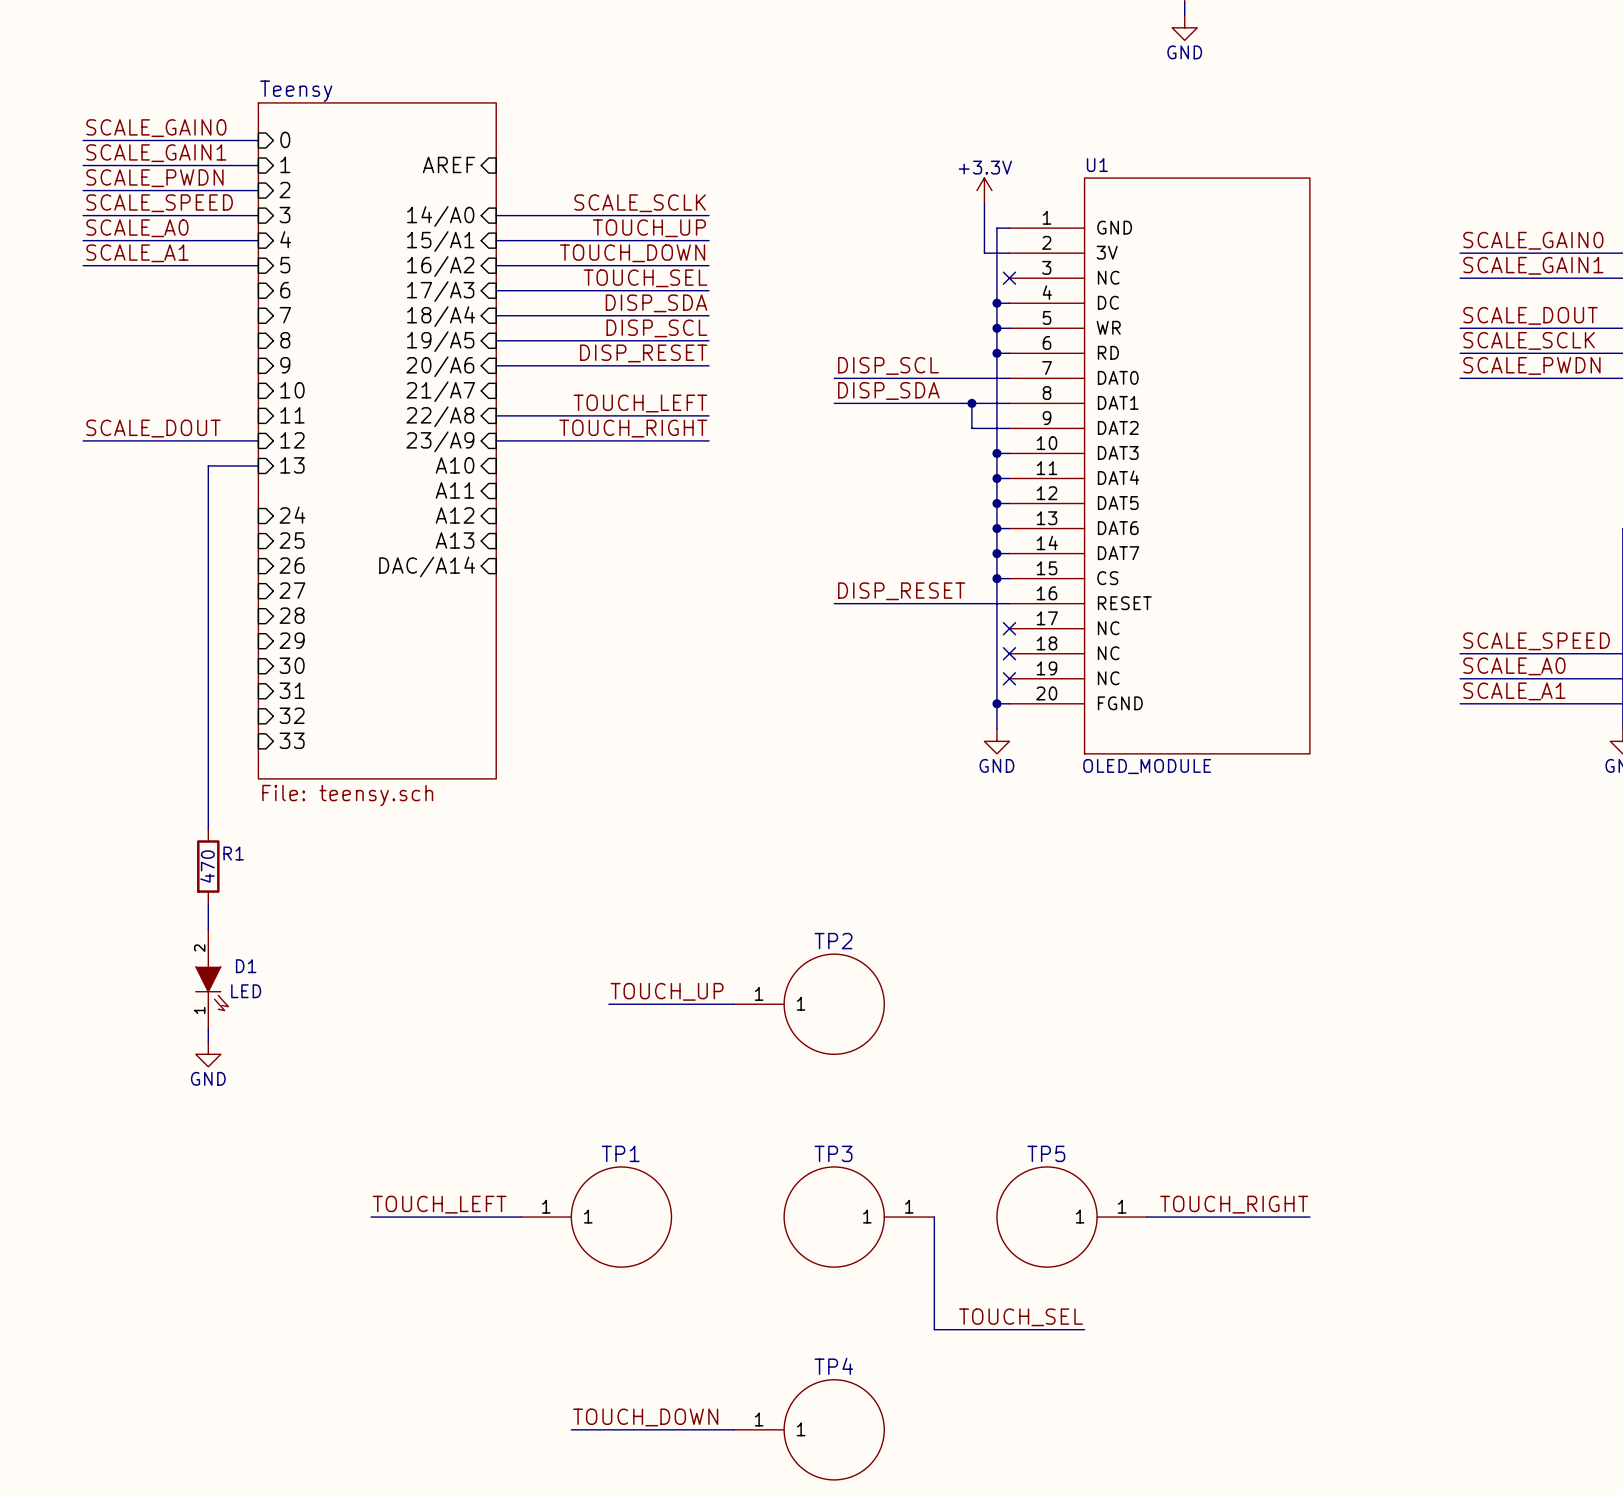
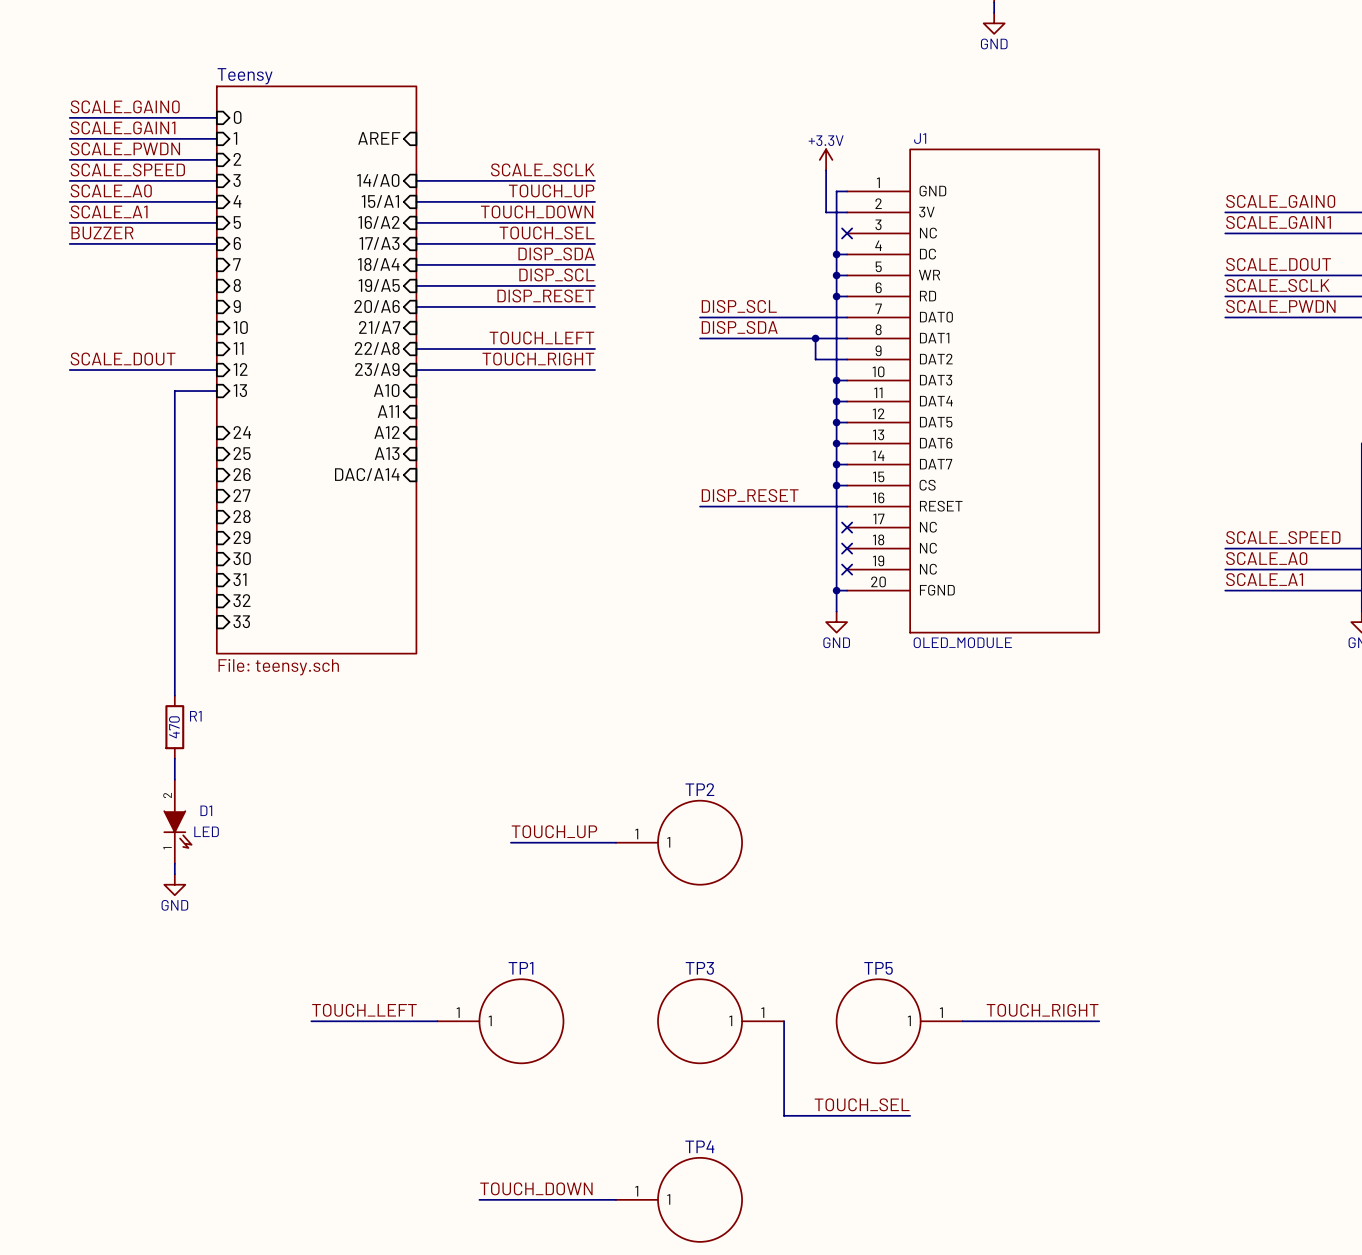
U1 name: U1 (1097, 165) -> J1 (920, 138)
label: none -> BUZZER (102, 233)
wire: none -> (69, 243) (216, 243)

